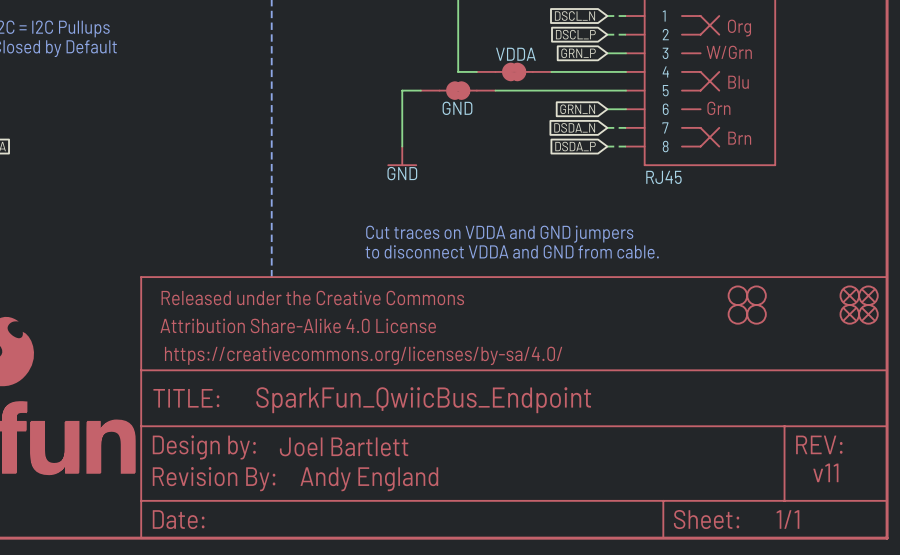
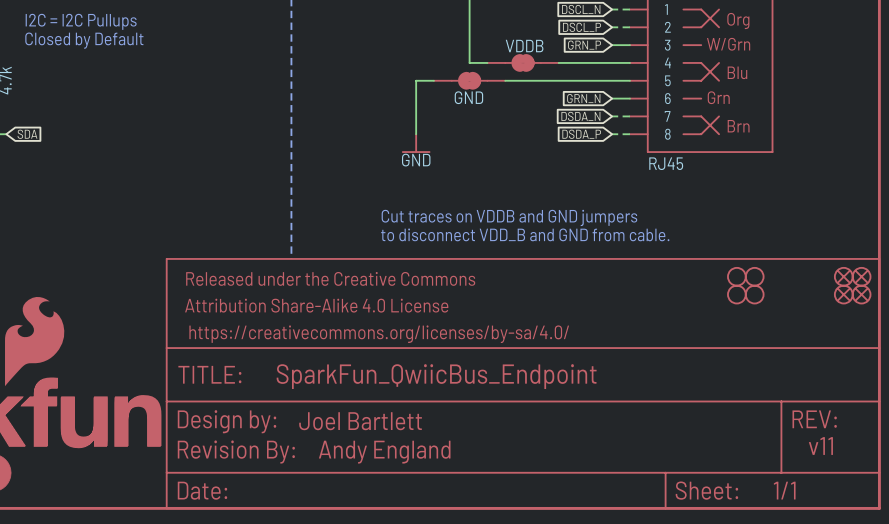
VDDA name: VDDA (515, 54) -> VDDB (524, 46)
text: Cut traces on VDDA and GND jumpers (499, 234) -> Cut traces on VDDB and GND jumpers (509, 217)
text: to disconnect VDDA and GND from cable. (512, 251) -> to disconnect VDD_B and GND from cable. (525, 234)

